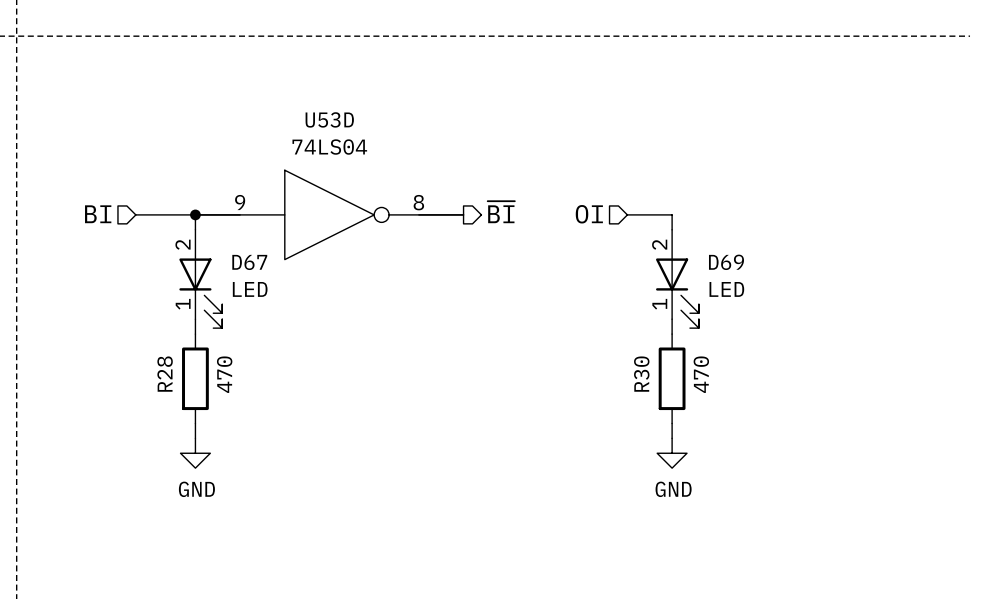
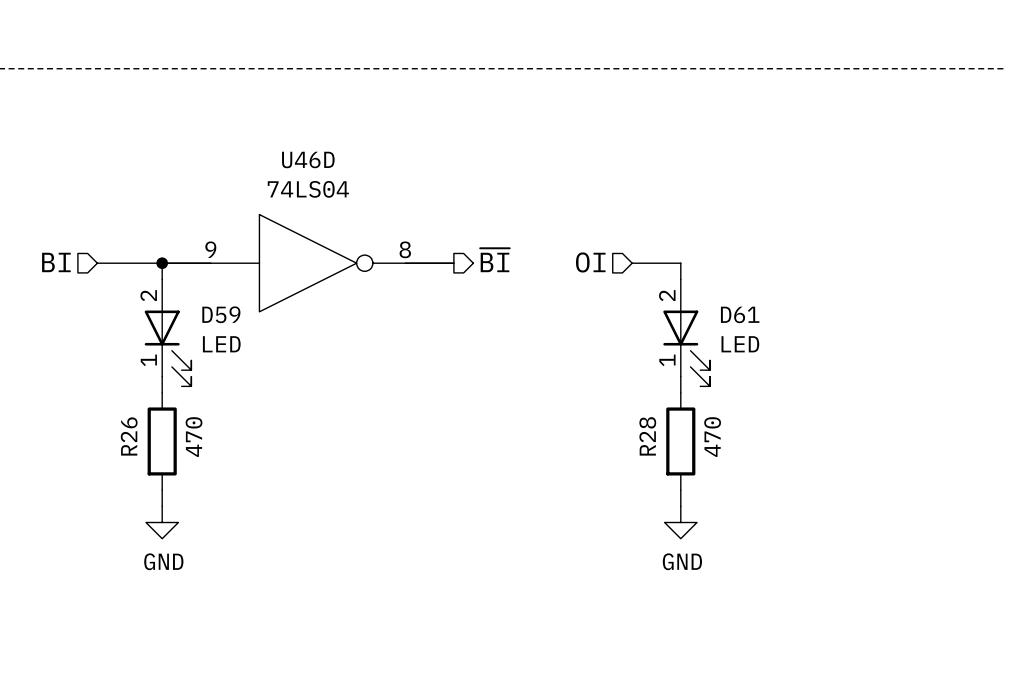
U53D name: U53D (329, 119) -> U46D (308, 159)
D67 name: D67 (249, 262) -> D59 (221, 314)
D69 name: D69 (726, 262) -> D61 (740, 314)
R28 name: R28 (165, 374) -> R26 (129, 436)
R30 name: R30 (641, 374) -> R28 (647, 436)

